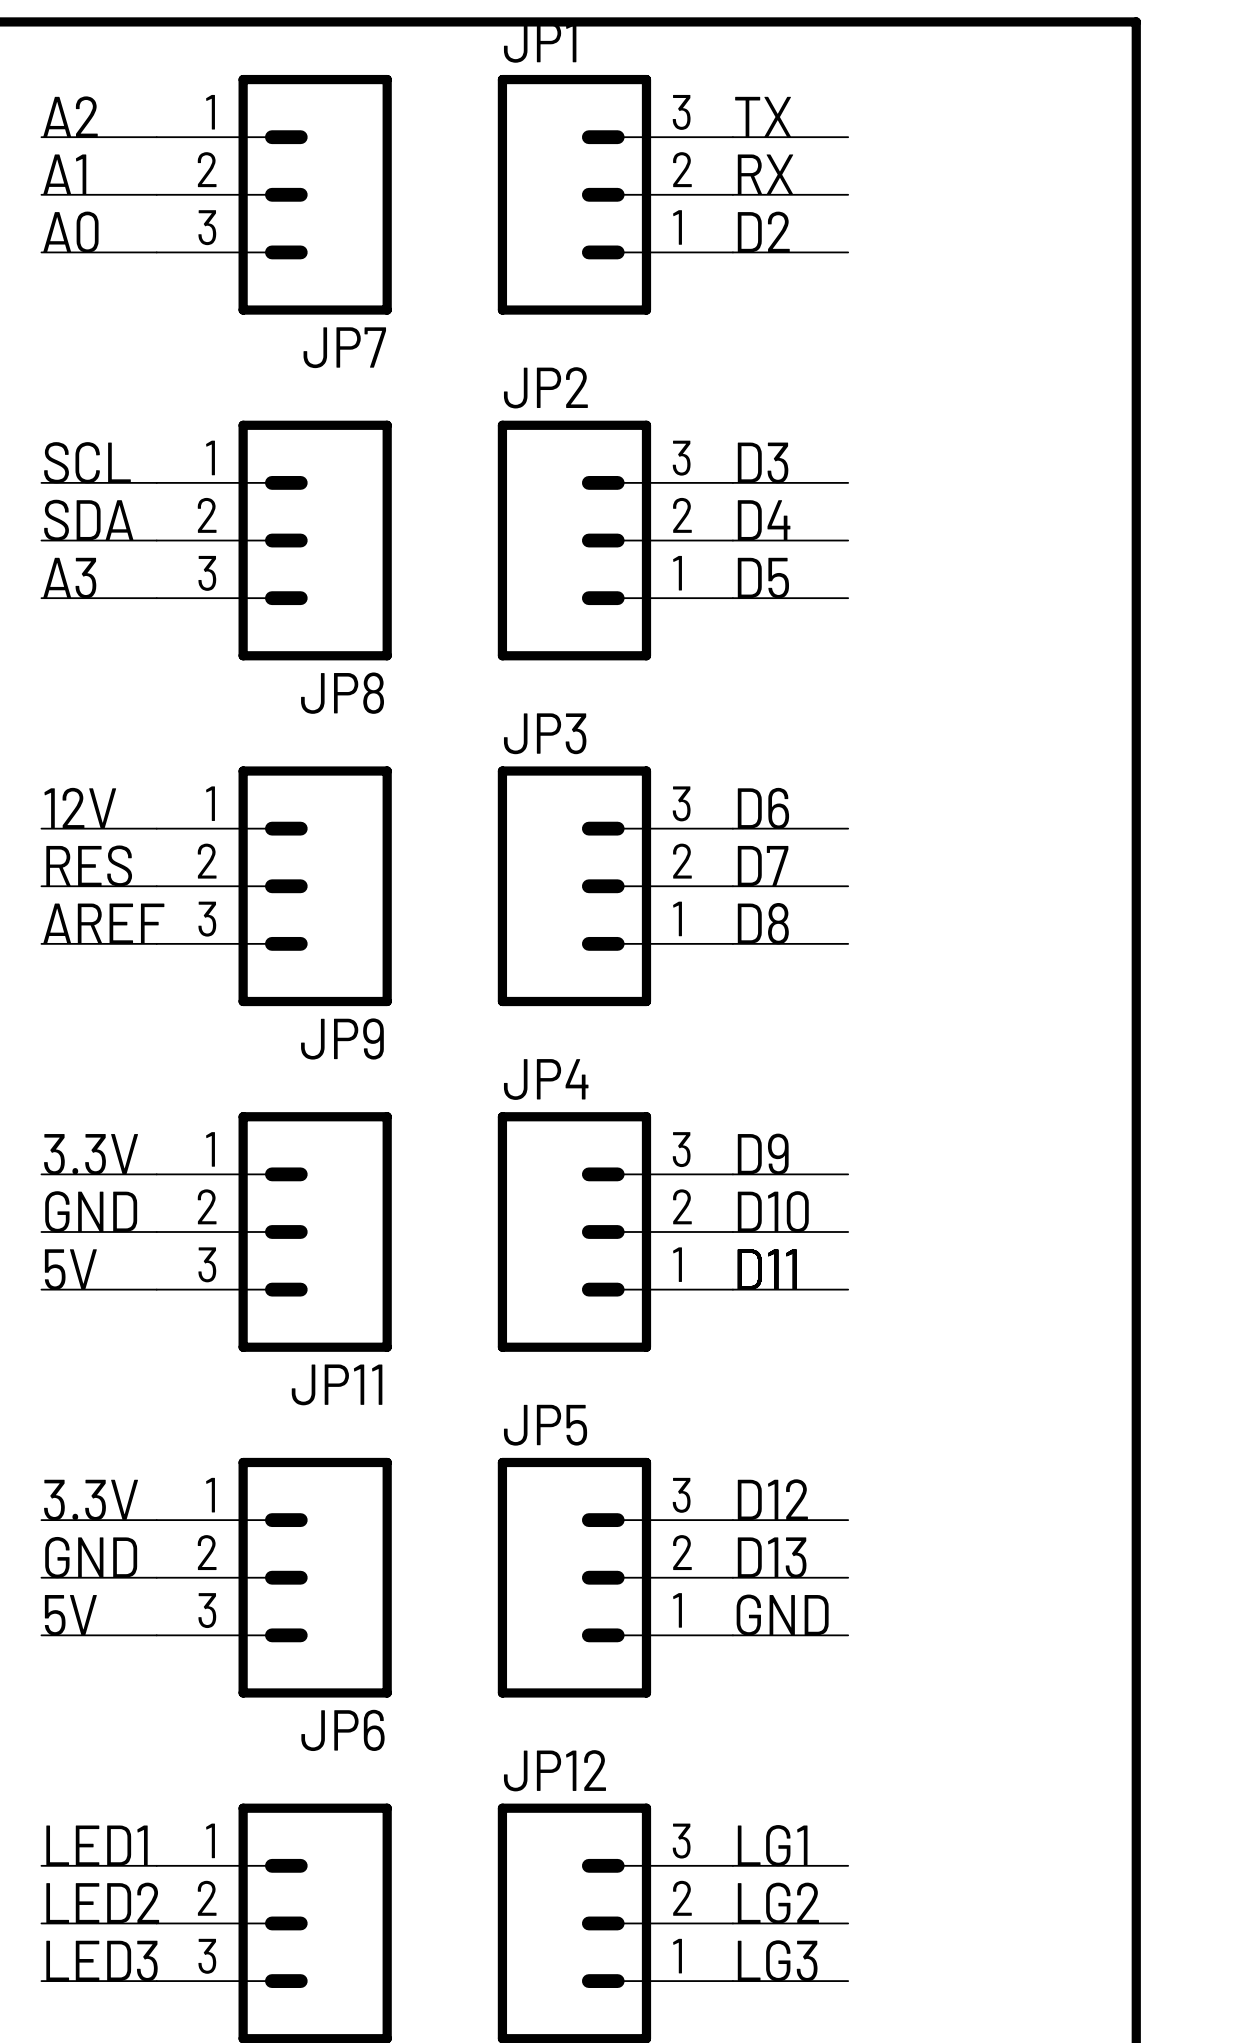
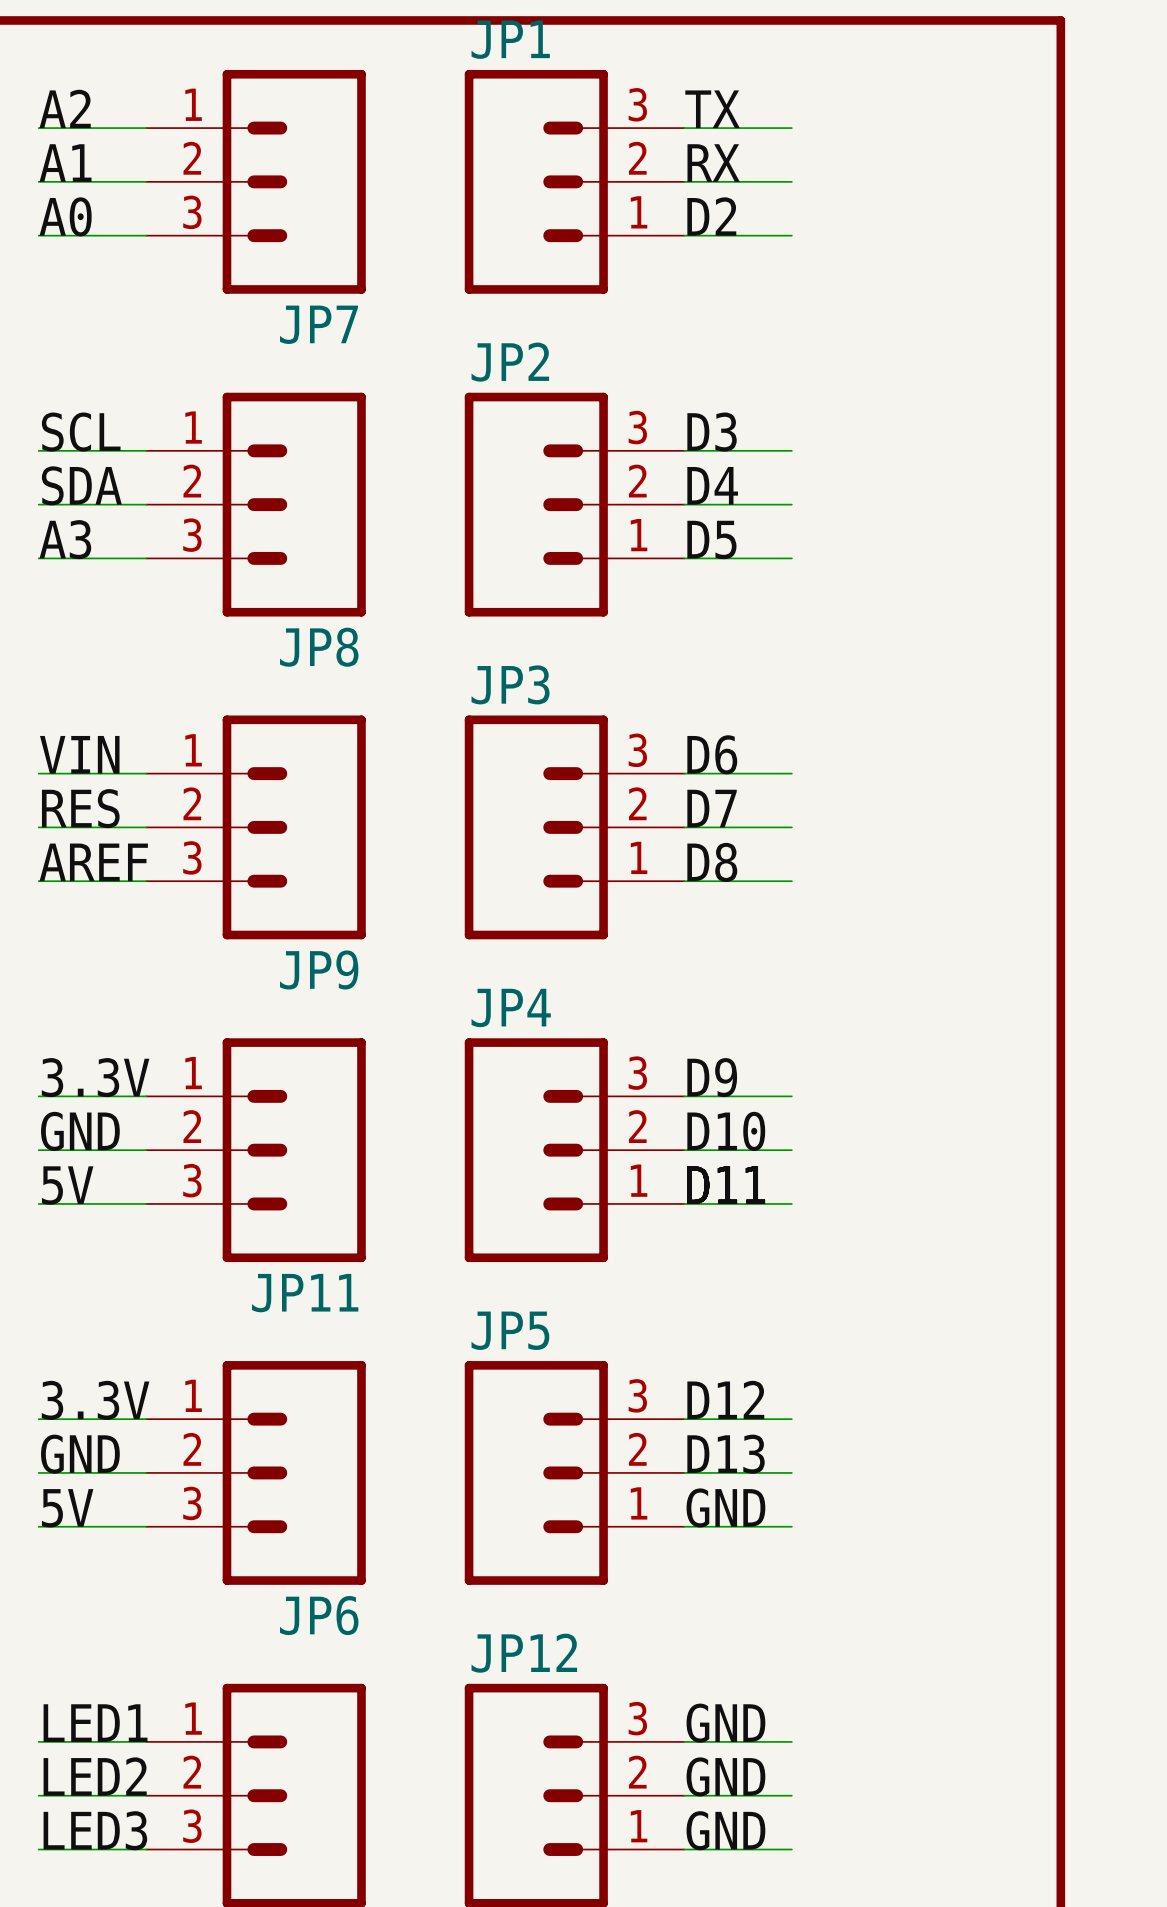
label: 12V (80, 808) -> VIN (79, 754)
label: LG1 (772, 1845) -> GND (725, 1723)
label: LG2 (778, 1903) -> GND (725, 1776)
label: LG3 (777, 1960) -> GND (725, 1830)

